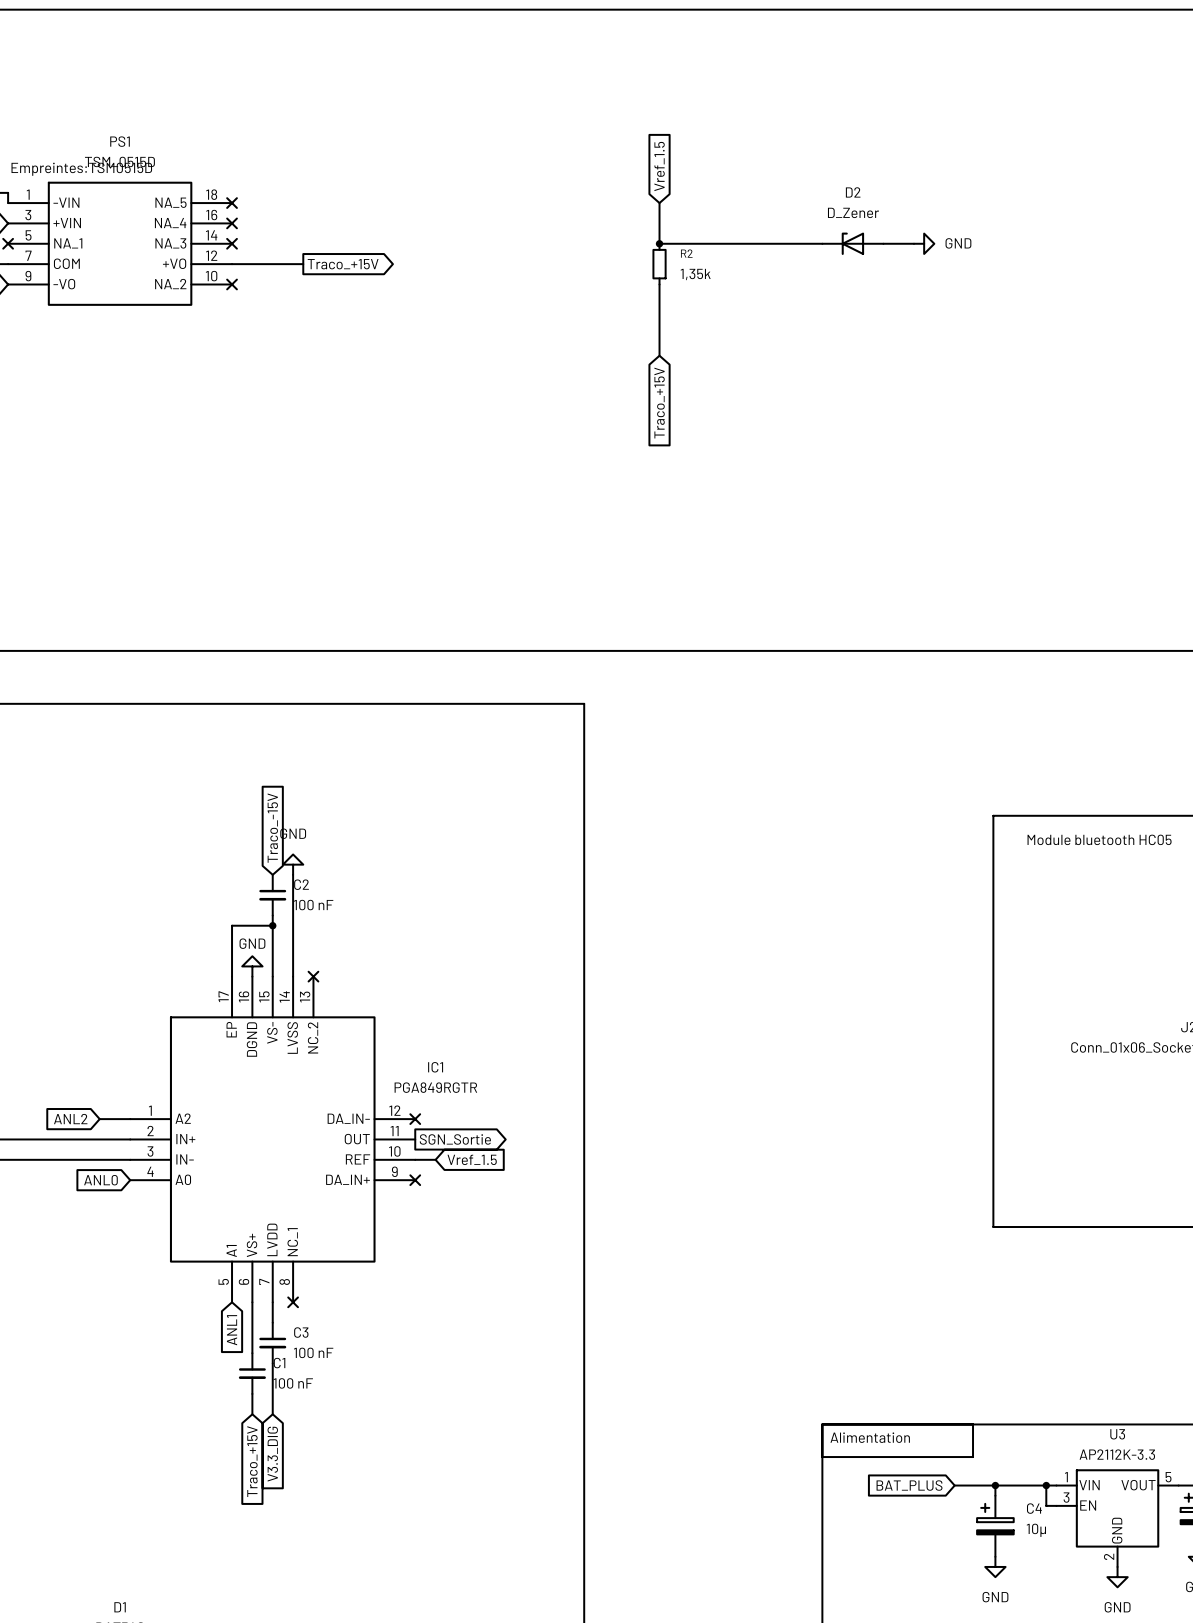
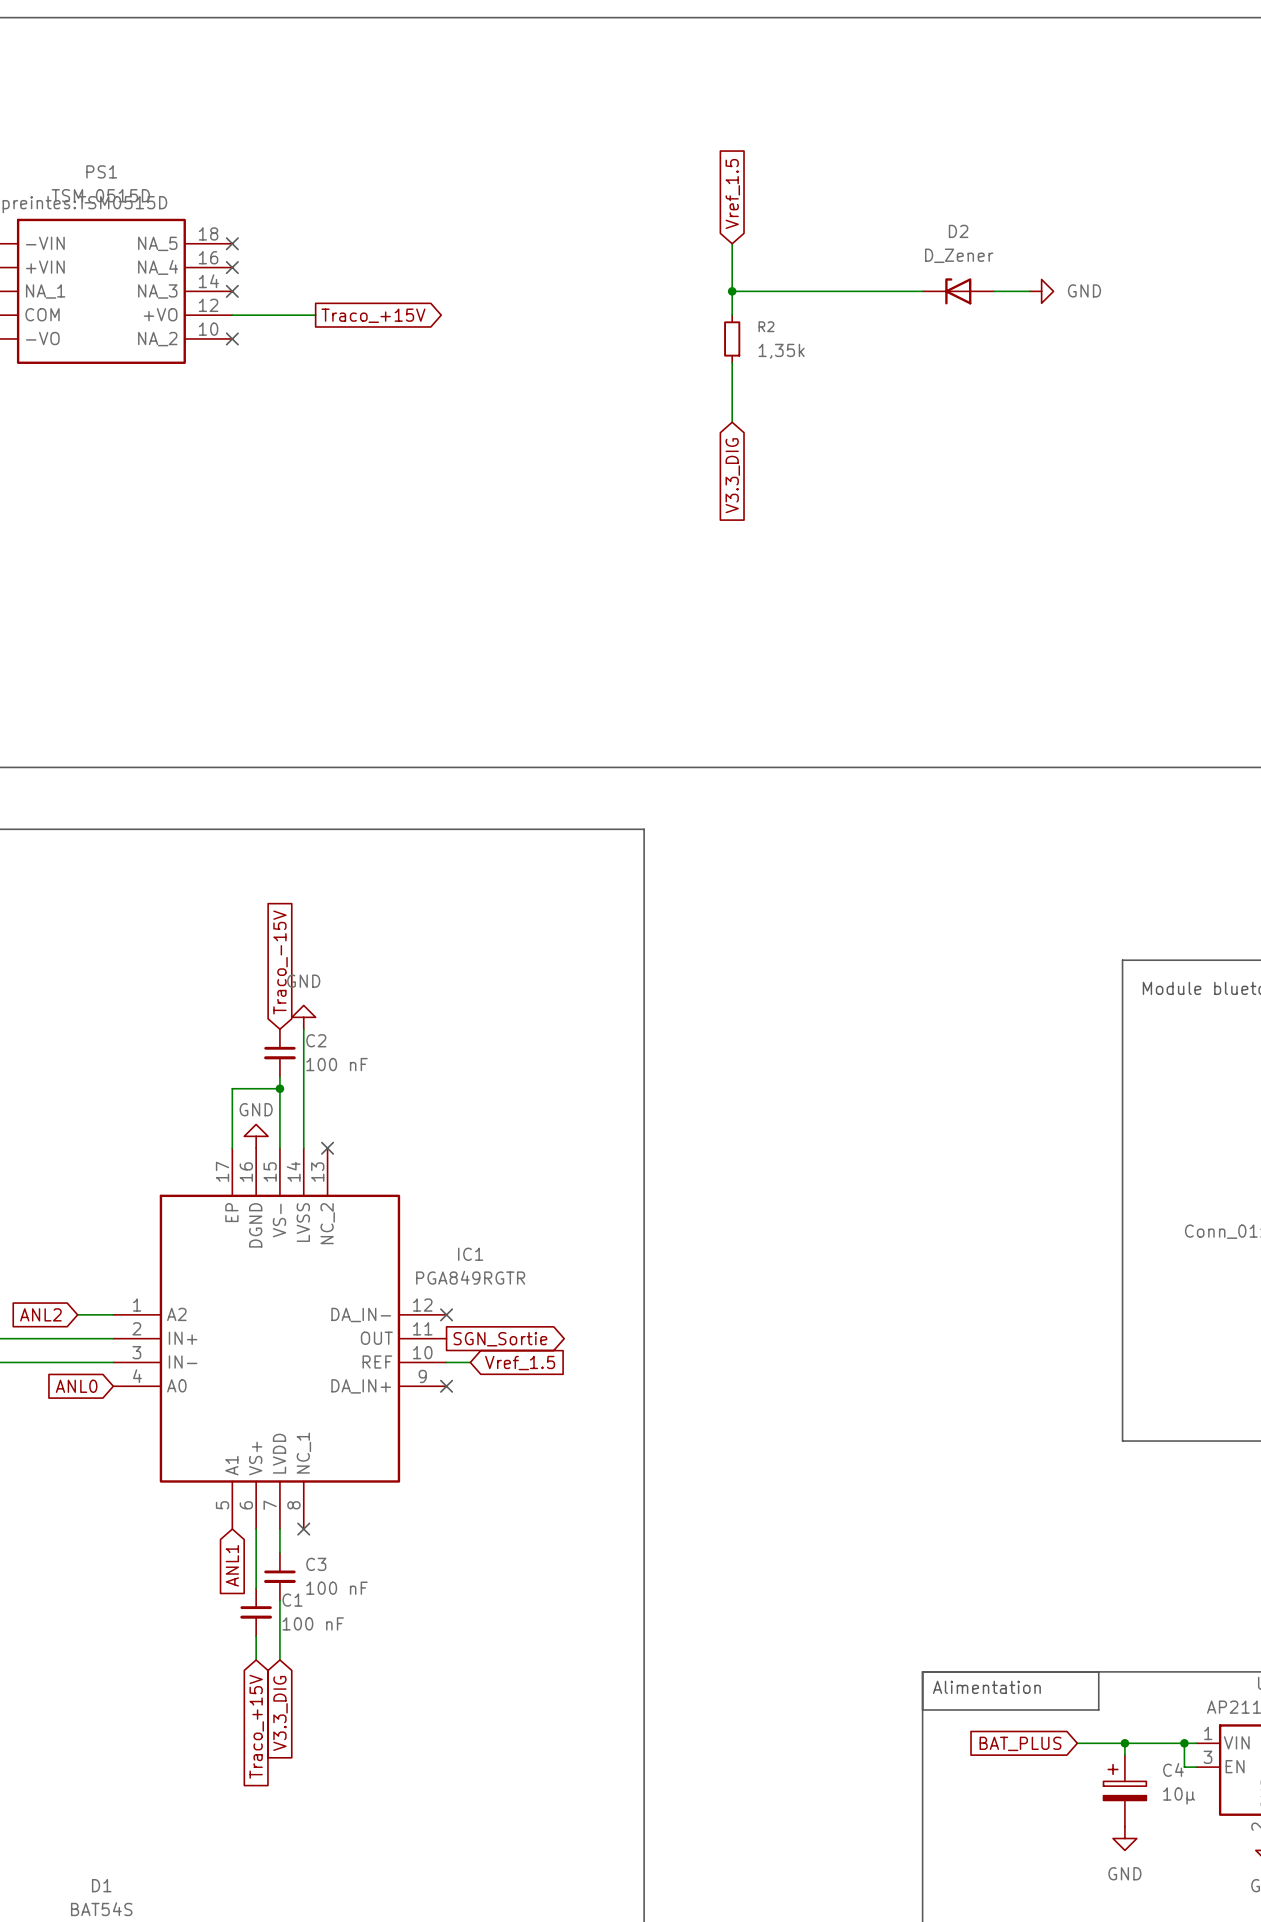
R2 position: (659, 264) -> (732, 338)
wire: (659, 284) (659, 304) -> (732, 291) (732, 315)
global label: Traco_+15V (659, 403) -> V3.3_DIG (732, 475)

